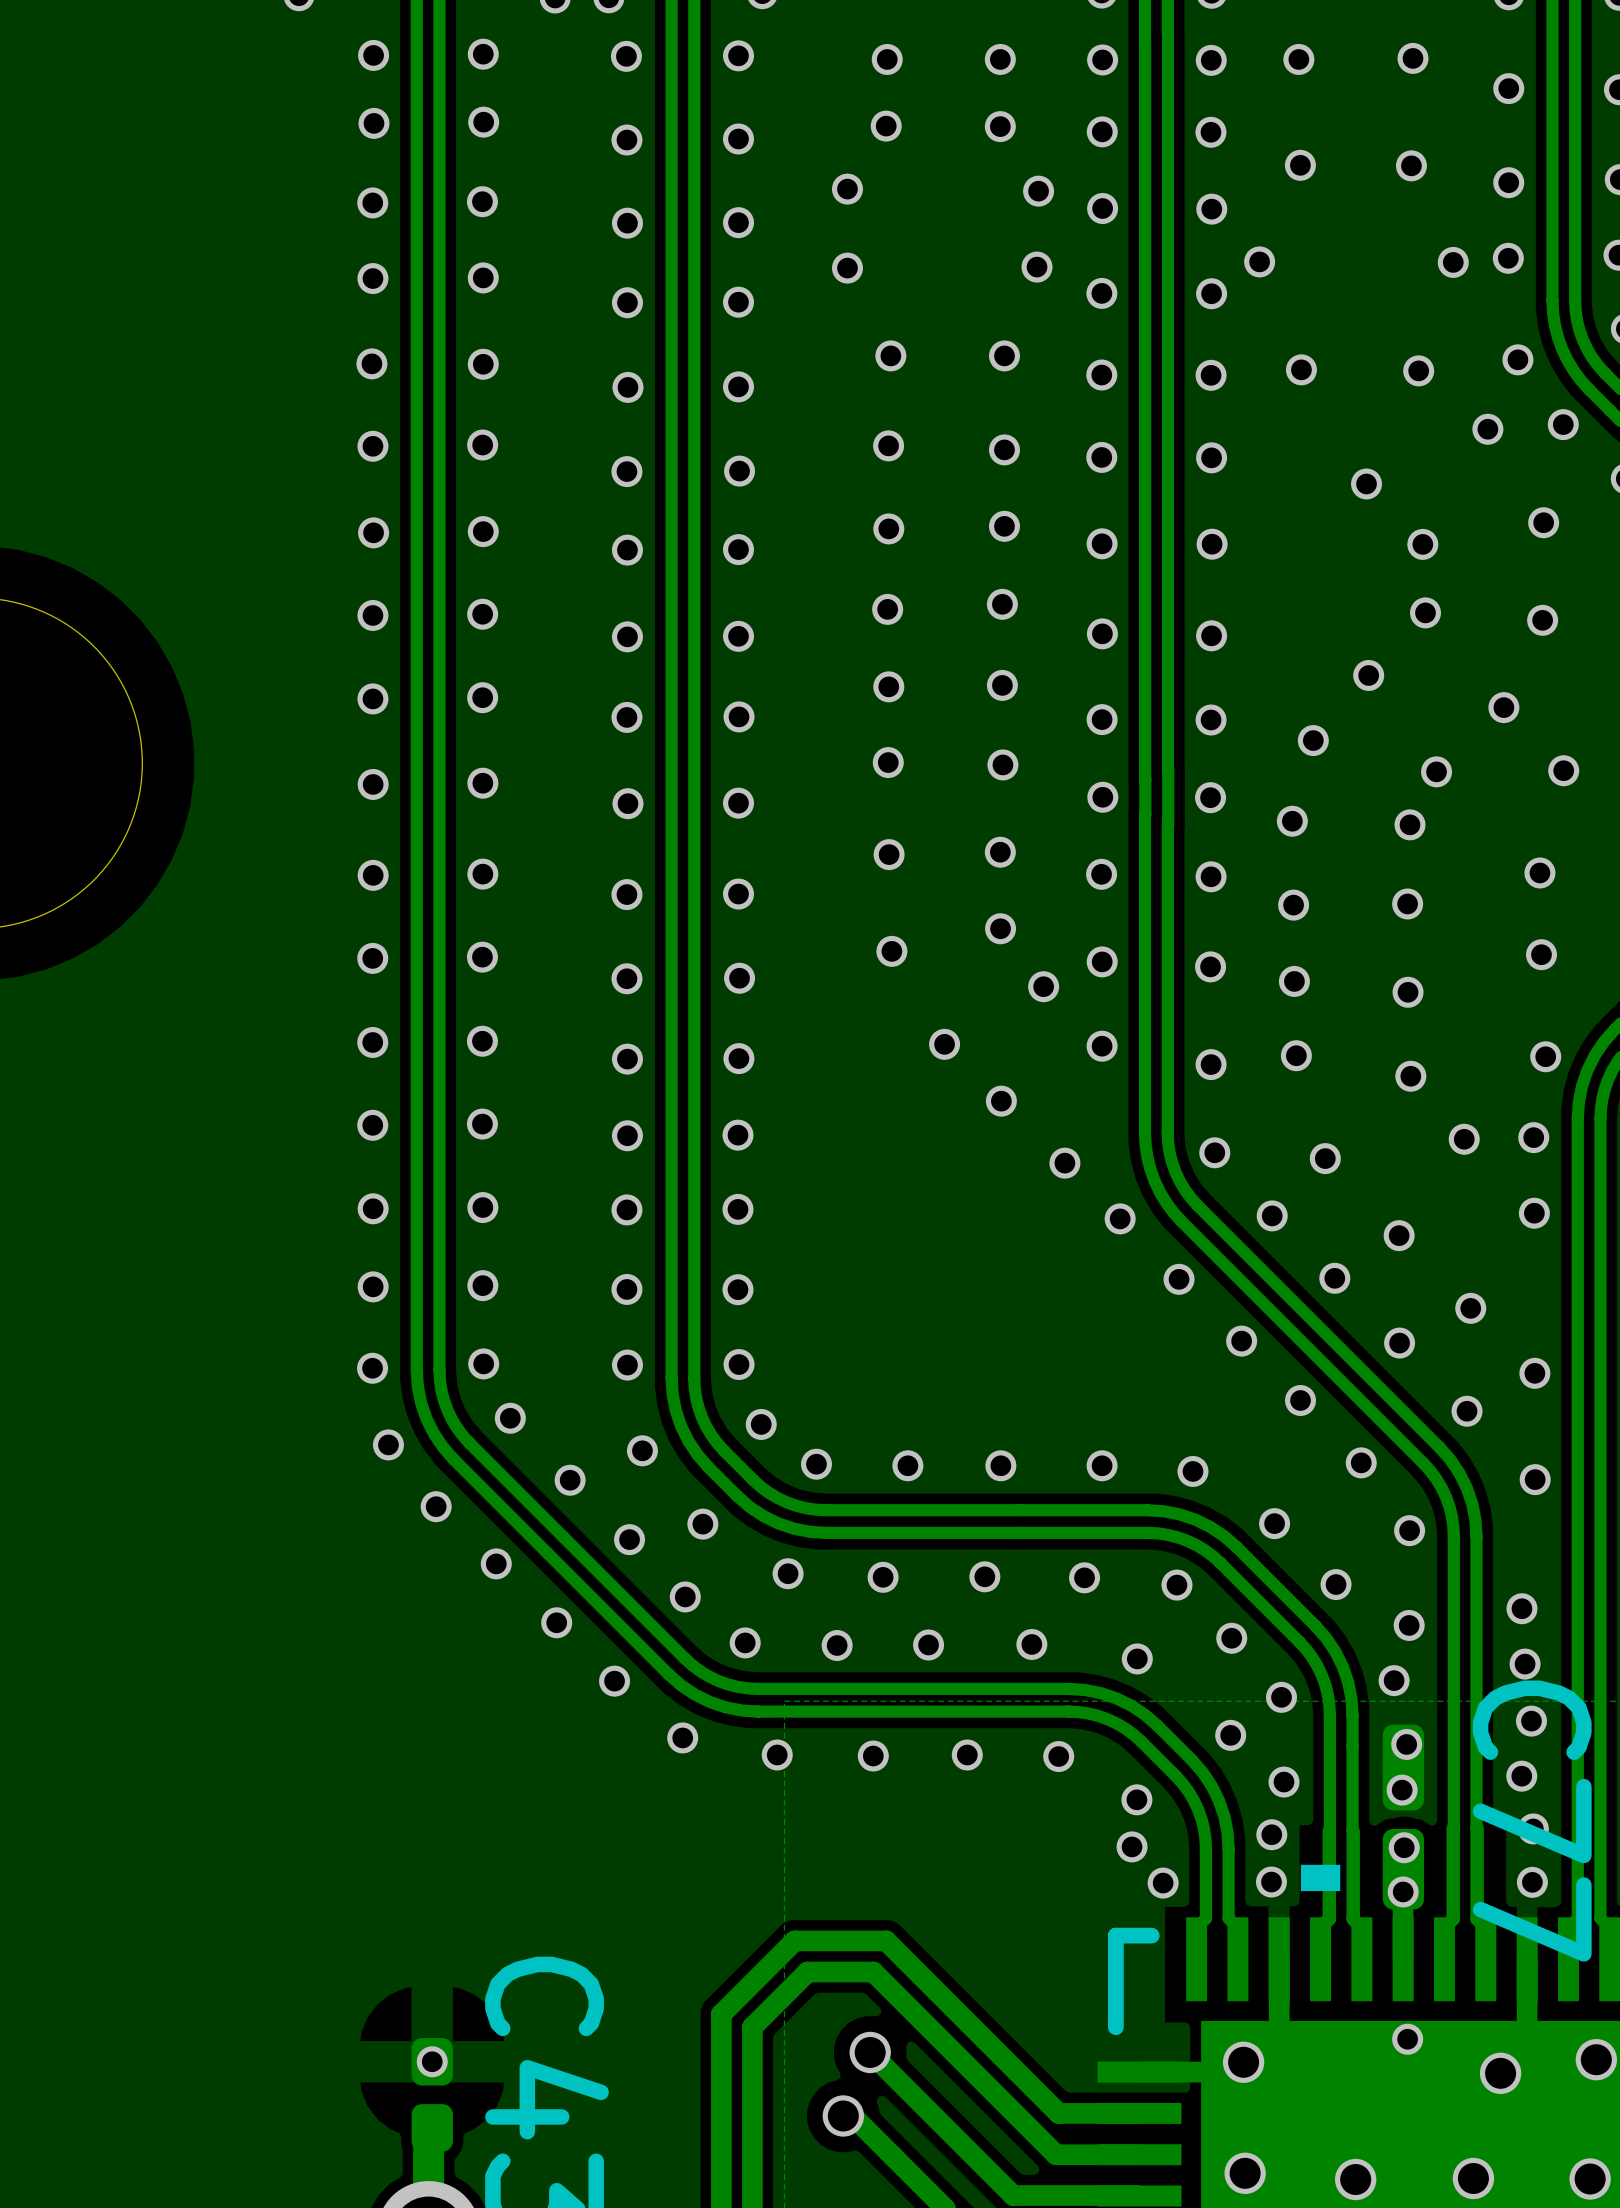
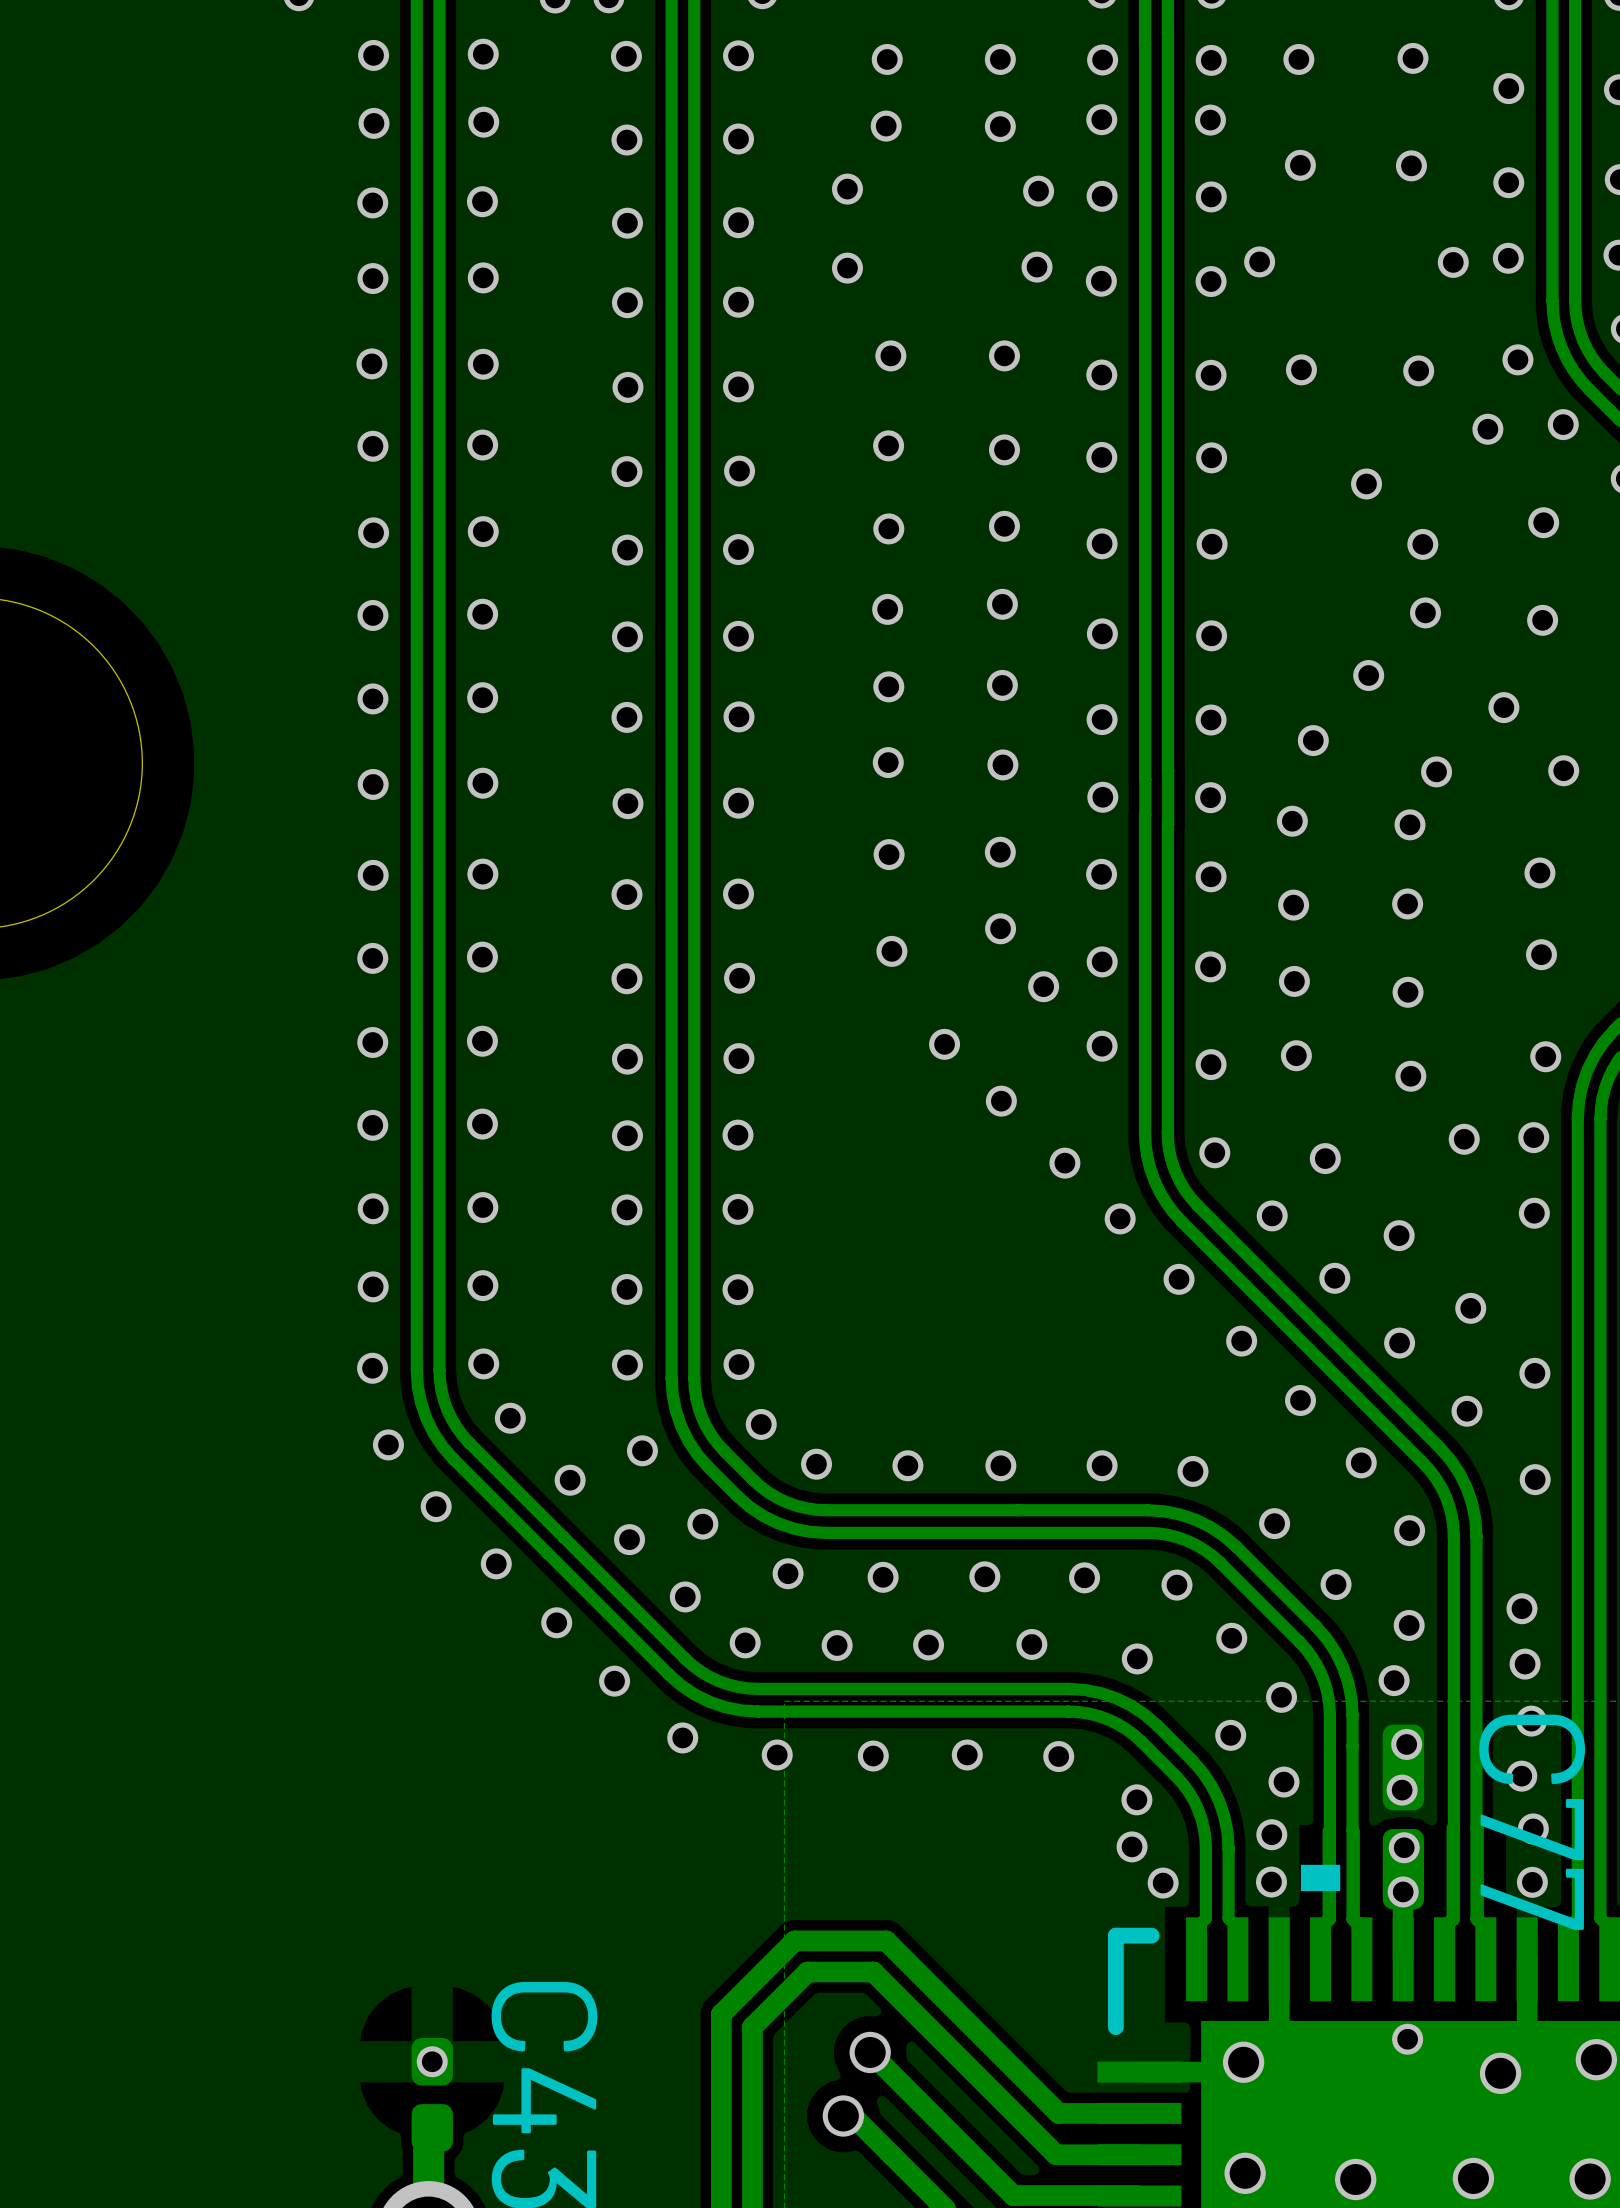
via position: (1102, 131) -> (1101, 119)
via position: (1210, 132) -> (1210, 120)
via position: (1102, 208) -> (1102, 196)
via position: (1211, 209) -> (1211, 196)
via position: (1101, 293) -> (1101, 281)
via position: (1211, 293) -> (1211, 281)

